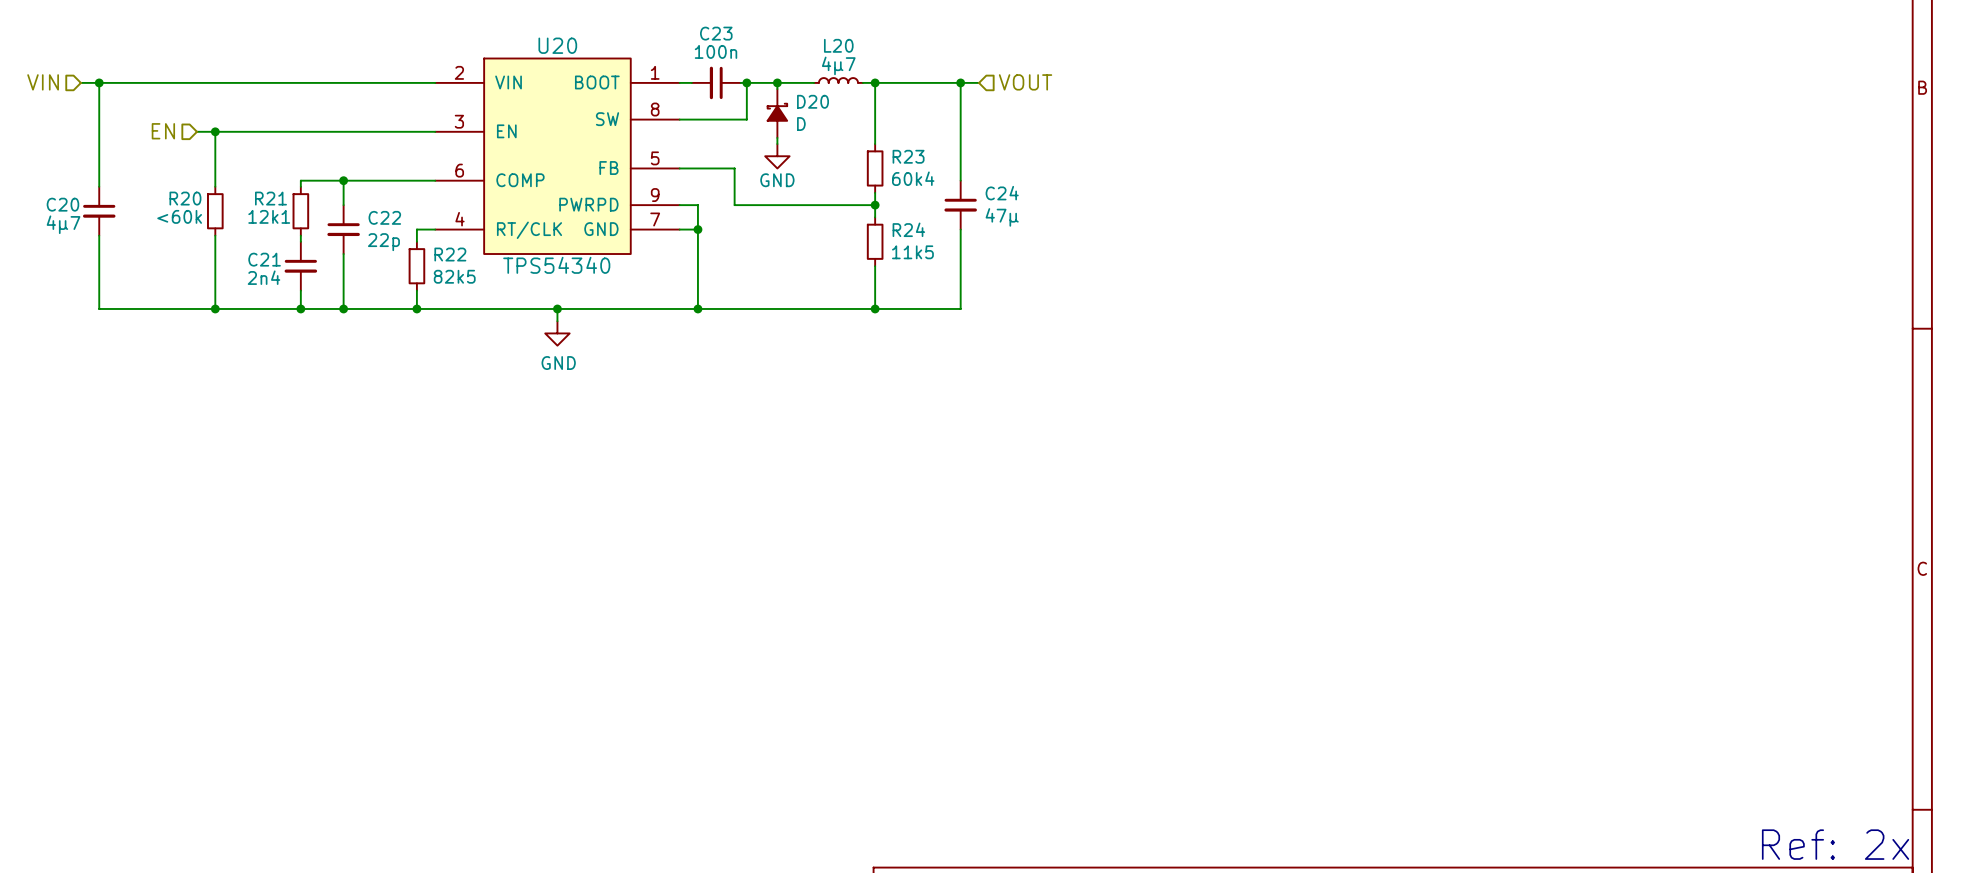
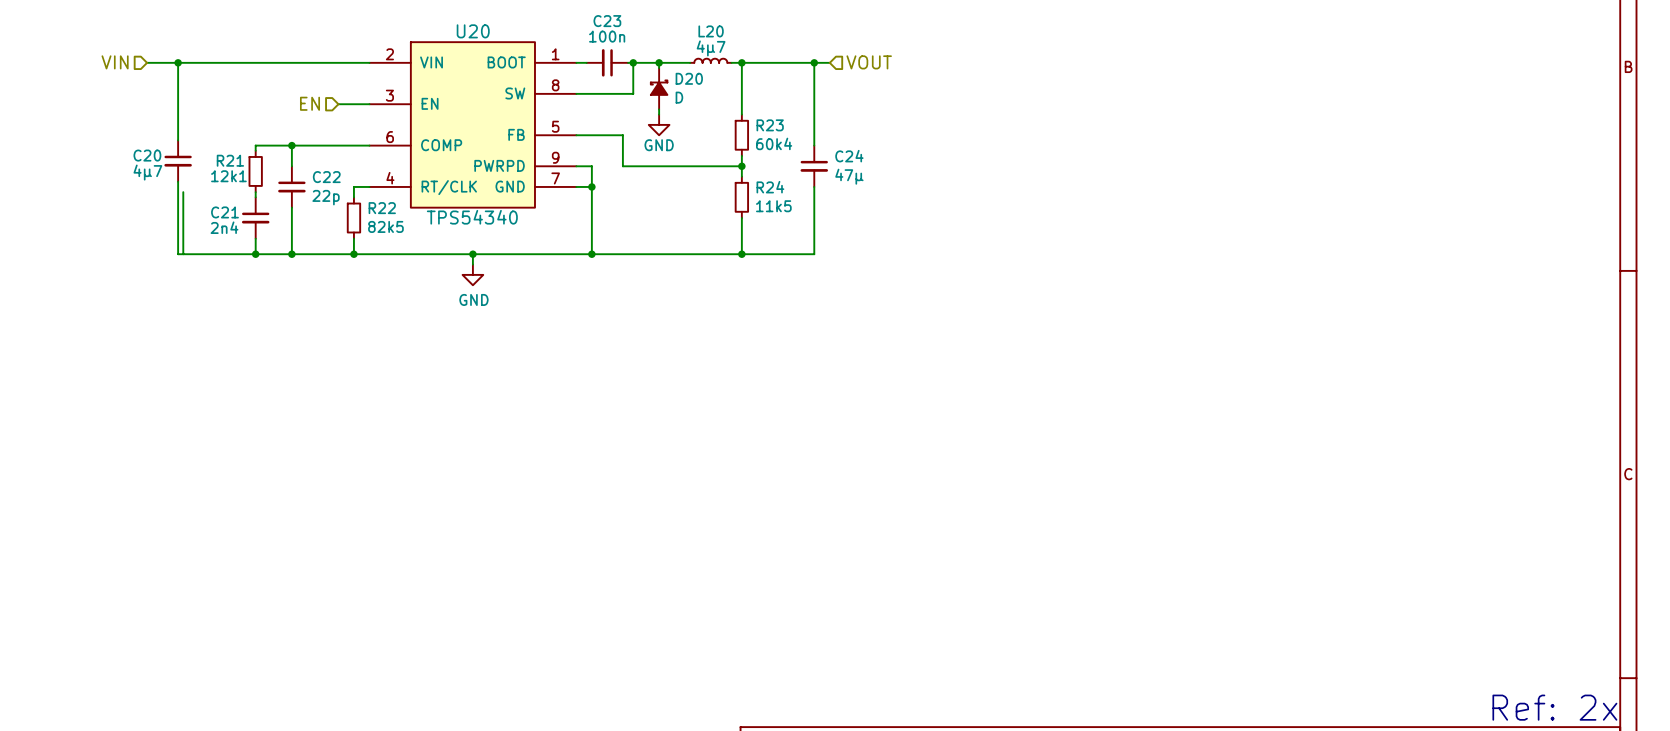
hierarchical label position: VIN (43, 82) -> VIN (115, 62)
wire: (80, 82) (172, 82) -> none
wire: (99, 82) (99, 186) -> none
junction: (99, 82) -> none
wire: none -> (178, 62) (178, 140)
hierarchical label position: EN (163, 131) -> EN (309, 103)
wire: (196, 131) (398, 131) -> none
wire: (215, 131) (215, 186) -> none
junction position: (215, 131) -> (178, 62)
C20 position: (99, 211) -> (178, 161)
R20: <60k (215, 211) -> none
wire: (99, 235) (99, 308) (209, 308) -> (178, 181) (178, 254)
junction: (215, 308) -> none

